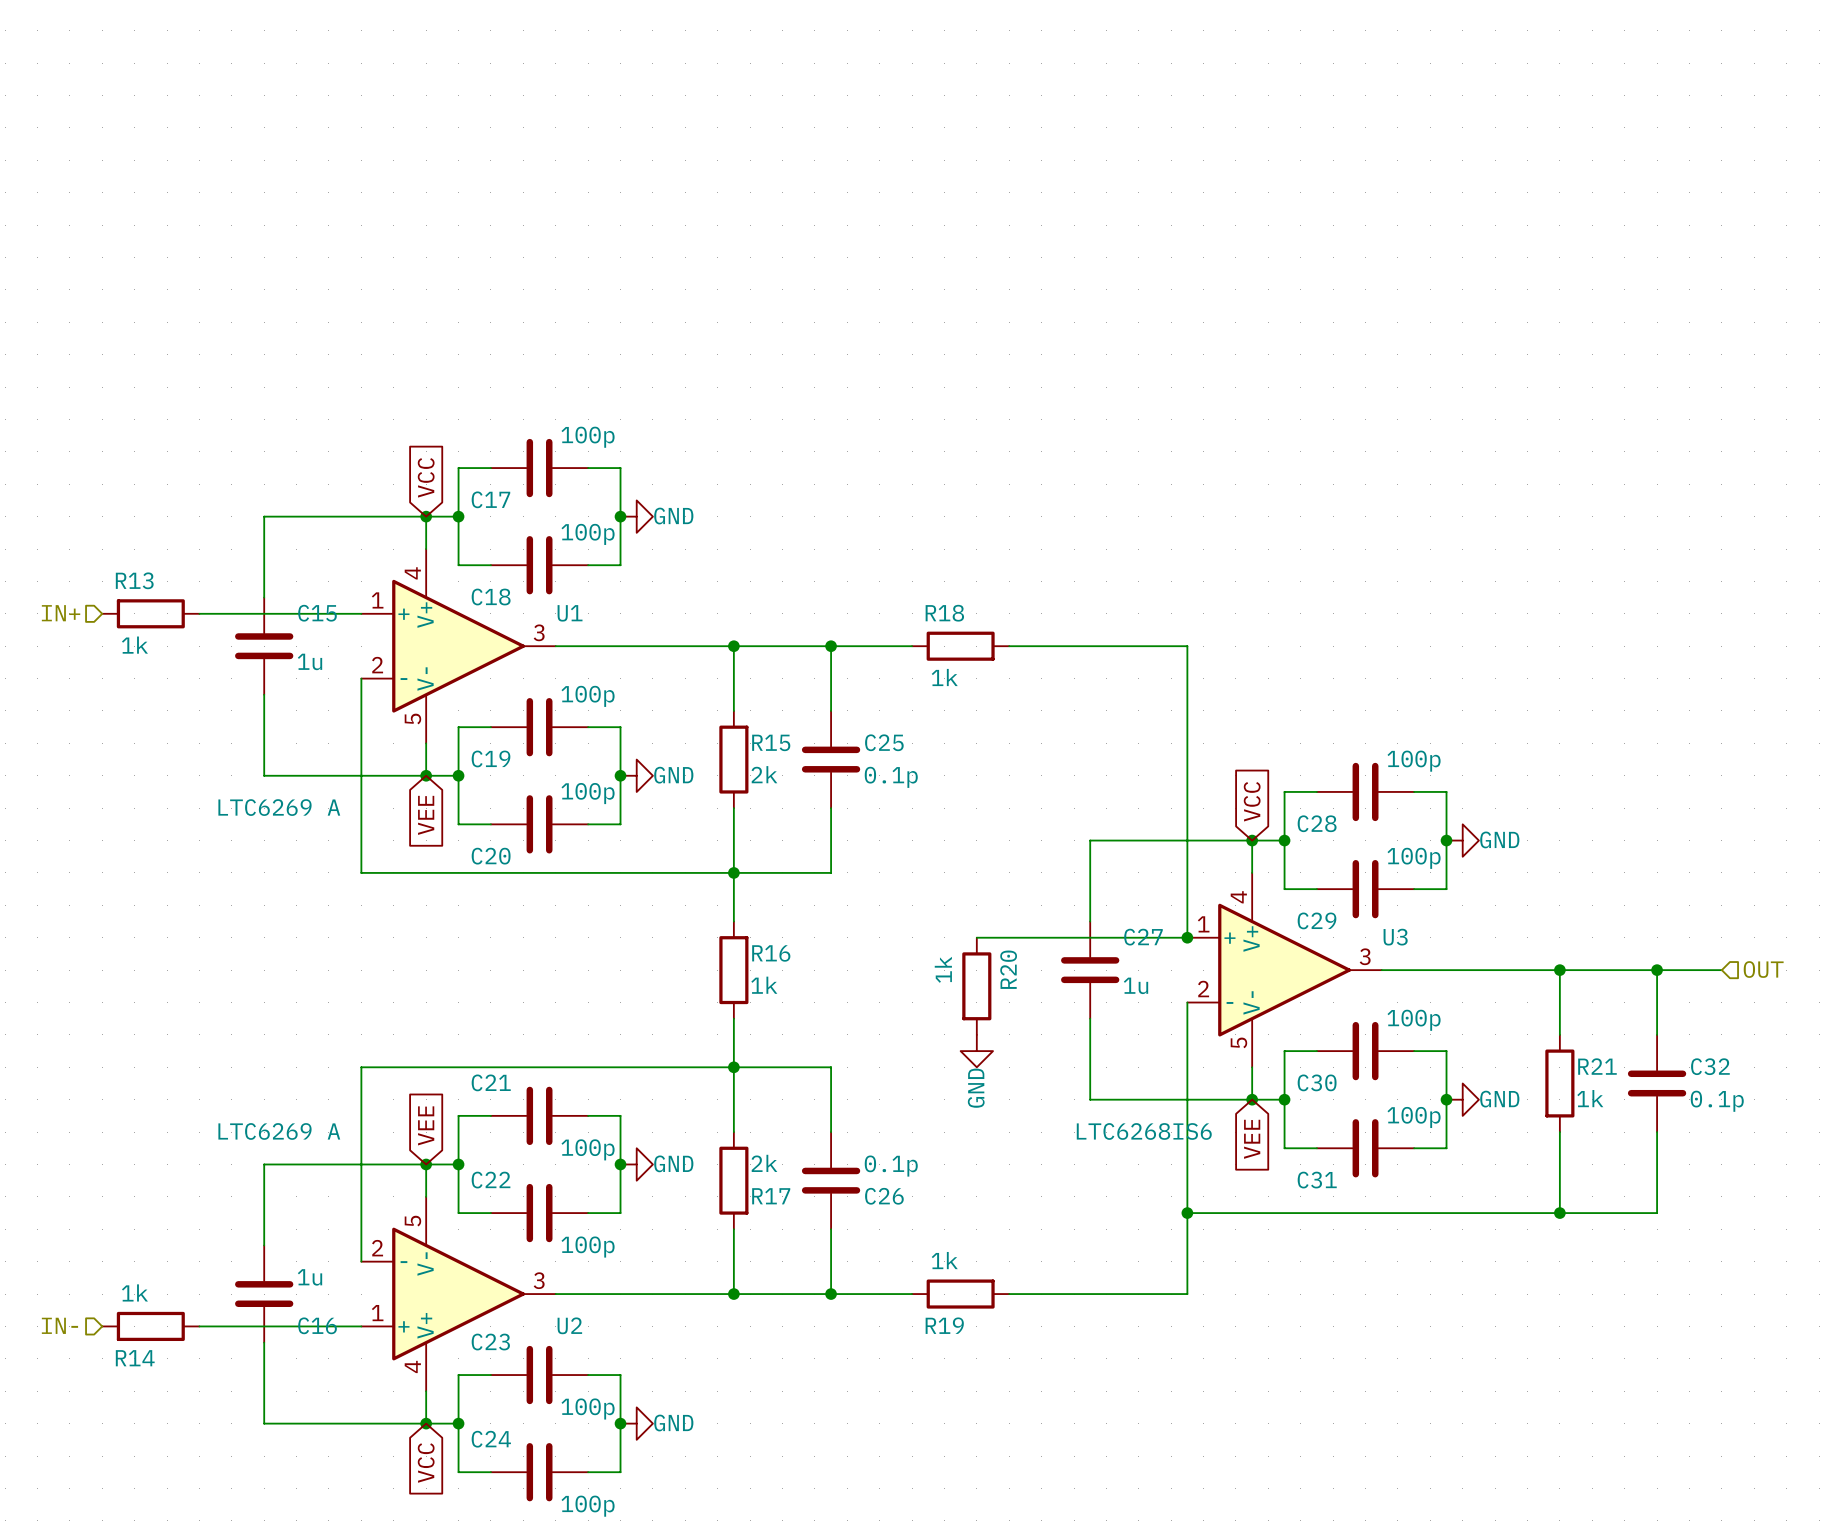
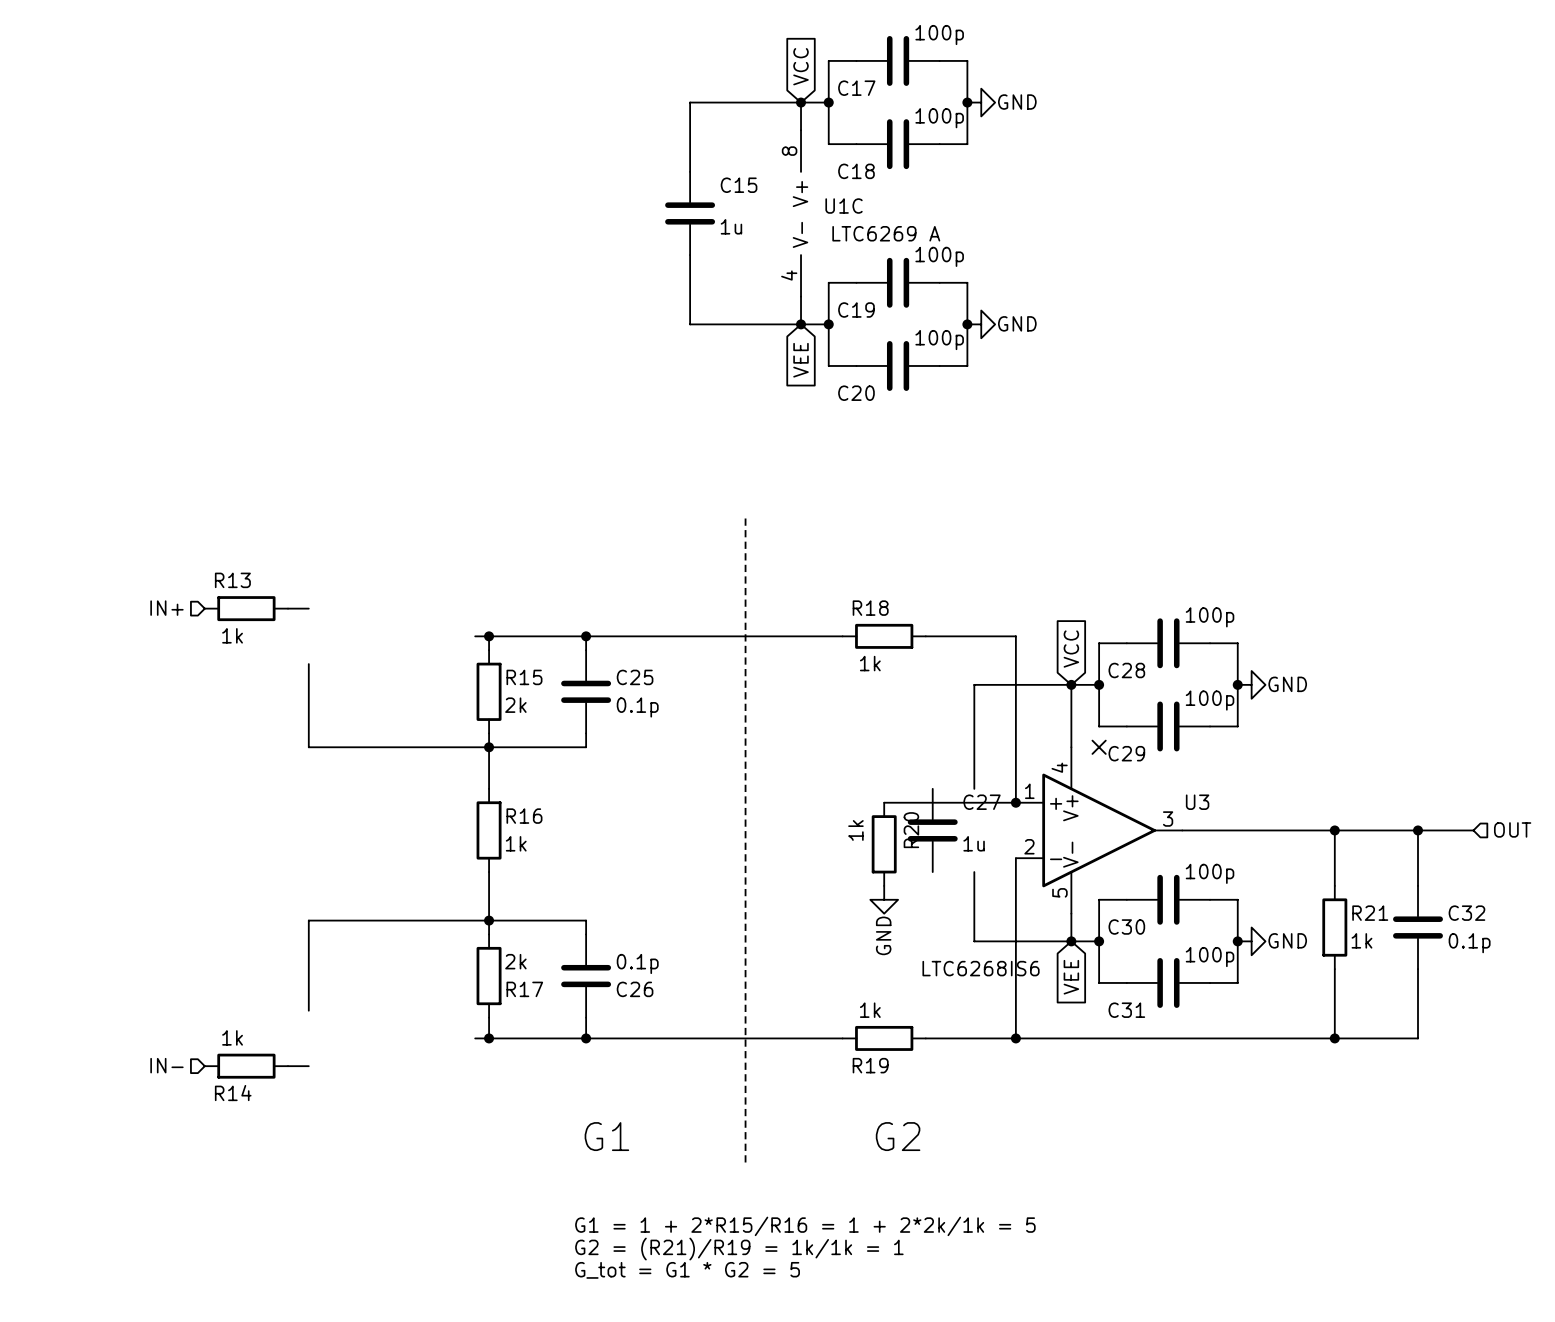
wire: none -> (856, 60) (828, 60) (828, 144) (856, 144)
wire: none -> (939, 60) (967, 60) (967, 144) (939, 144)
global label: none -> VCC (801, 66)
wire: none -> (801, 102) (801, 130)
junction: none -> (801, 102)
wire: none -> (828, 102) (690, 102) (690, 171)
junction: none -> (828, 102)
junction: none -> (967, 102)
power symbol: none -> GND (981, 102)
U1C: none -> LTC6269 A (801, 213)
wire: none -> (690, 255) (690, 324) (828, 324)
wire: none -> (856, 282) (828, 282) (828, 365) (856, 365)
wire: none -> (939, 282) (967, 282) (967, 365) (939, 365)
wire: none -> (801, 296) (801, 324)
junction: none -> (801, 324)
junction: none -> (828, 324)
junction: none -> (967, 324)
power symbol: none -> GND (981, 324)
global label: none -> VEE (801, 360)
wire: (490, 468) (458, 468) (458, 565) (490, 565) -> none
C17 position: (539, 468) -> (898, 60)
wire: (588, 468) (620, 468) (620, 565) (588, 565) -> none
global label: VCC (426, 477) -> none
wire: (426, 516) (426, 549) -> none
junction: (426, 516) -> none
wire: (458, 516) (264, 516) (264, 597) -> none
junction: (458, 516) -> none
junction: (620, 516) -> none
power symbol: GND (636, 516) -> none
C18 position: (539, 565) -> (898, 144)
line: none -> (745, 518) (745, 1163)
hierarchical label position: IN+ (61, 613) -> IN+ (166, 608)
R13 position: (150, 613) -> (246, 608)
wire: (199, 613) (361, 613) -> none
C15 position: (264, 646) -> (690, 213)
U1: LTC6269 A (458, 646) -> none
wire: (555, 646) (912, 646) -> none
wire: (733, 646) (733, 710) -> (489, 733) (489, 788)
junction: (733, 646) -> none
wire: (831, 646) (831, 710) -> none
junction: (831, 646) -> none
R18 position: (960, 646) -> (884, 636)
wire: (1009, 646) (1187, 646) (1187, 743) -> (925, 636) (1015, 636)
wire: (361, 678) (361, 775) -> none
wire: (264, 694) (264, 775) (458, 775) -> none
wire: none -> (288, 608) (308, 608)
wire: (490, 727) (458, 727) (458, 824) (490, 824) -> none
C19 position: (539, 727) -> (898, 282)
wire: (588, 727) (620, 727) (620, 824) (588, 824) -> none
wire: (426, 743) (426, 775) -> none
wire: none -> (475, 636) (842, 636)
wire: none -> (489, 636) (489, 650)
junction: none -> (489, 636)
wire: none -> (586, 636) (586, 650)
junction: none -> (586, 636)
R15 position: (733, 759) -> (489, 691)
C25 position: (831, 759) -> (586, 691)
junction: (426, 775) -> none
junction: (458, 775) -> none
junction: (620, 775) -> none
power symbol: GND (636, 775) -> none
wire: (1284, 791) (1316, 791) -> (1099, 677) (1099, 643) (1126, 643)
C28 position: (1365, 791) -> (1168, 643)
wire: (1414, 791) (1446, 791) -> (1210, 643) (1237, 643) (1237, 677)
wire: none -> (1071, 684) (1071, 719)
junction: none -> (1071, 684)
wire: none -> (1099, 684) (974, 684) (974, 788)
junction: none -> (1099, 684)
global label position: VCC (1252, 801) -> VCC (1071, 649)
wire: (733, 808) (733, 921) -> none
wire: (831, 808) (831, 872) (685, 872) -> (586, 733) (586, 747)
global label: VEE (426, 815) -> none
C20 position: (539, 824) -> (898, 365)
junction: (1252, 840) -> none
wire: (1284, 840) (1090, 840) (1090, 921) -> none
junction: (1284, 840) -> none
junction position: (1446, 840) -> (1237, 684)
power symbol position: GND (1462, 840) -> GND (1251, 684)
wire: (1284, 848) (1284, 889) (1316, 889) -> (1099, 726) (1126, 726)
wire: (1446, 848) (1446, 889) (1414, 889) -> (1237, 726) (1210, 726)
junction: none -> (489, 747)
junction: (733, 872) -> none
no-connect mark: none -> (1099, 747)
C29 position: (1365, 889) -> (1168, 726)
wire: (976, 937) (1033, 937) -> none
R16 position: (733, 970) -> (489, 830)
R20 position: (976, 986) -> (884, 844)
wire: none -> (489, 872) (489, 934)
wire: (733, 1018) (733, 1132) -> none
wire: (1090, 1018) (1090, 1099) (1138, 1099) -> (974, 872) (974, 941)
power symbol position: GND (976, 1051) -> GND (884, 899)
junction: (733, 1067) -> none
wire: (361, 1075) (361, 1067) (831, 1067) (831, 1132) -> (308, 920) (586, 920) (586, 934)
junction: none -> (489, 920)
wire: (490, 1115) (458, 1115) (458, 1213) (490, 1213) -> none
C21: 100p (539, 1115) -> none
wire: (588, 1115) (620, 1115) (620, 1213) -> (842, 1038) (530, 1038)
global label: VEE (426, 1125) -> none
wire: (426, 1164) (426, 1196) -> none
junction: (426, 1164) -> none
wire: (458, 1164) (264, 1164) (264, 1245) -> none
junction: (458, 1164) -> none
junction: (620, 1164) -> none
power symbol: GND (636, 1164) -> none
wire: (361, 1180) (361, 1261) -> none
R17 position: (733, 1180) -> (489, 976)
C26 position: (831, 1180) -> (586, 976)
wire: none -> (489, 1017) (489, 1038)
wire: none -> (586, 1017) (586, 1038)
C22: 100p (539, 1213) -> none
junction: none -> (489, 1038)
junction: none -> (586, 1038)
wire: (1187, 1213) (1187, 1294) (1009, 1294) -> (1015, 1038) (925, 1038)
wire: (733, 1229) (733, 1294) -> none
wire: (831, 1229) (831, 1294) -> none
wire: none -> (288, 1066) (308, 1066)
C16: 1u (264, 1294) -> none
U2: LTC6269 A (458, 1294) -> none
wire: (555, 1294) (912, 1294) -> none
junction: (733, 1294) -> none
junction: (831, 1294) -> none
R19 position: (960, 1294) -> (884, 1038)
hierarchical label position: IN- (59, 1325) -> IN- (166, 1065)
R14 position: (150, 1326) -> (246, 1066)
wire: (199, 1326) (361, 1326) -> none
text: none -> G1 (606, 1136)
text: none -> G2 (898, 1136)
wire: (264, 1342) (264, 1423) (458, 1423) -> none
wire: (490, 1375) (458, 1375) (458, 1472) (490, 1472) -> none
C23: 100p (539, 1375) -> none
wire: (588, 1375) (620, 1375) (620, 1472) (588, 1472) -> none
wire: (426, 1391) (426, 1423) -> none
junction: (426, 1423) -> none
junction: (458, 1423) -> none
junction: (620, 1423) -> none
power symbol: GND (636, 1423) -> none
text: none -> G1 = 1 + 2*R15/R16 = 1 + 2*2k/1k = 5 (805, 1226)
text: none -> G2 = (R21)/R19 = 1k/1k = 1 (739, 1249)
global label: VCC (426, 1463) -> none
C24: 100p (539, 1472) -> none
text: none -> G_tot = G1 * G2 = 5 (687, 1270)

